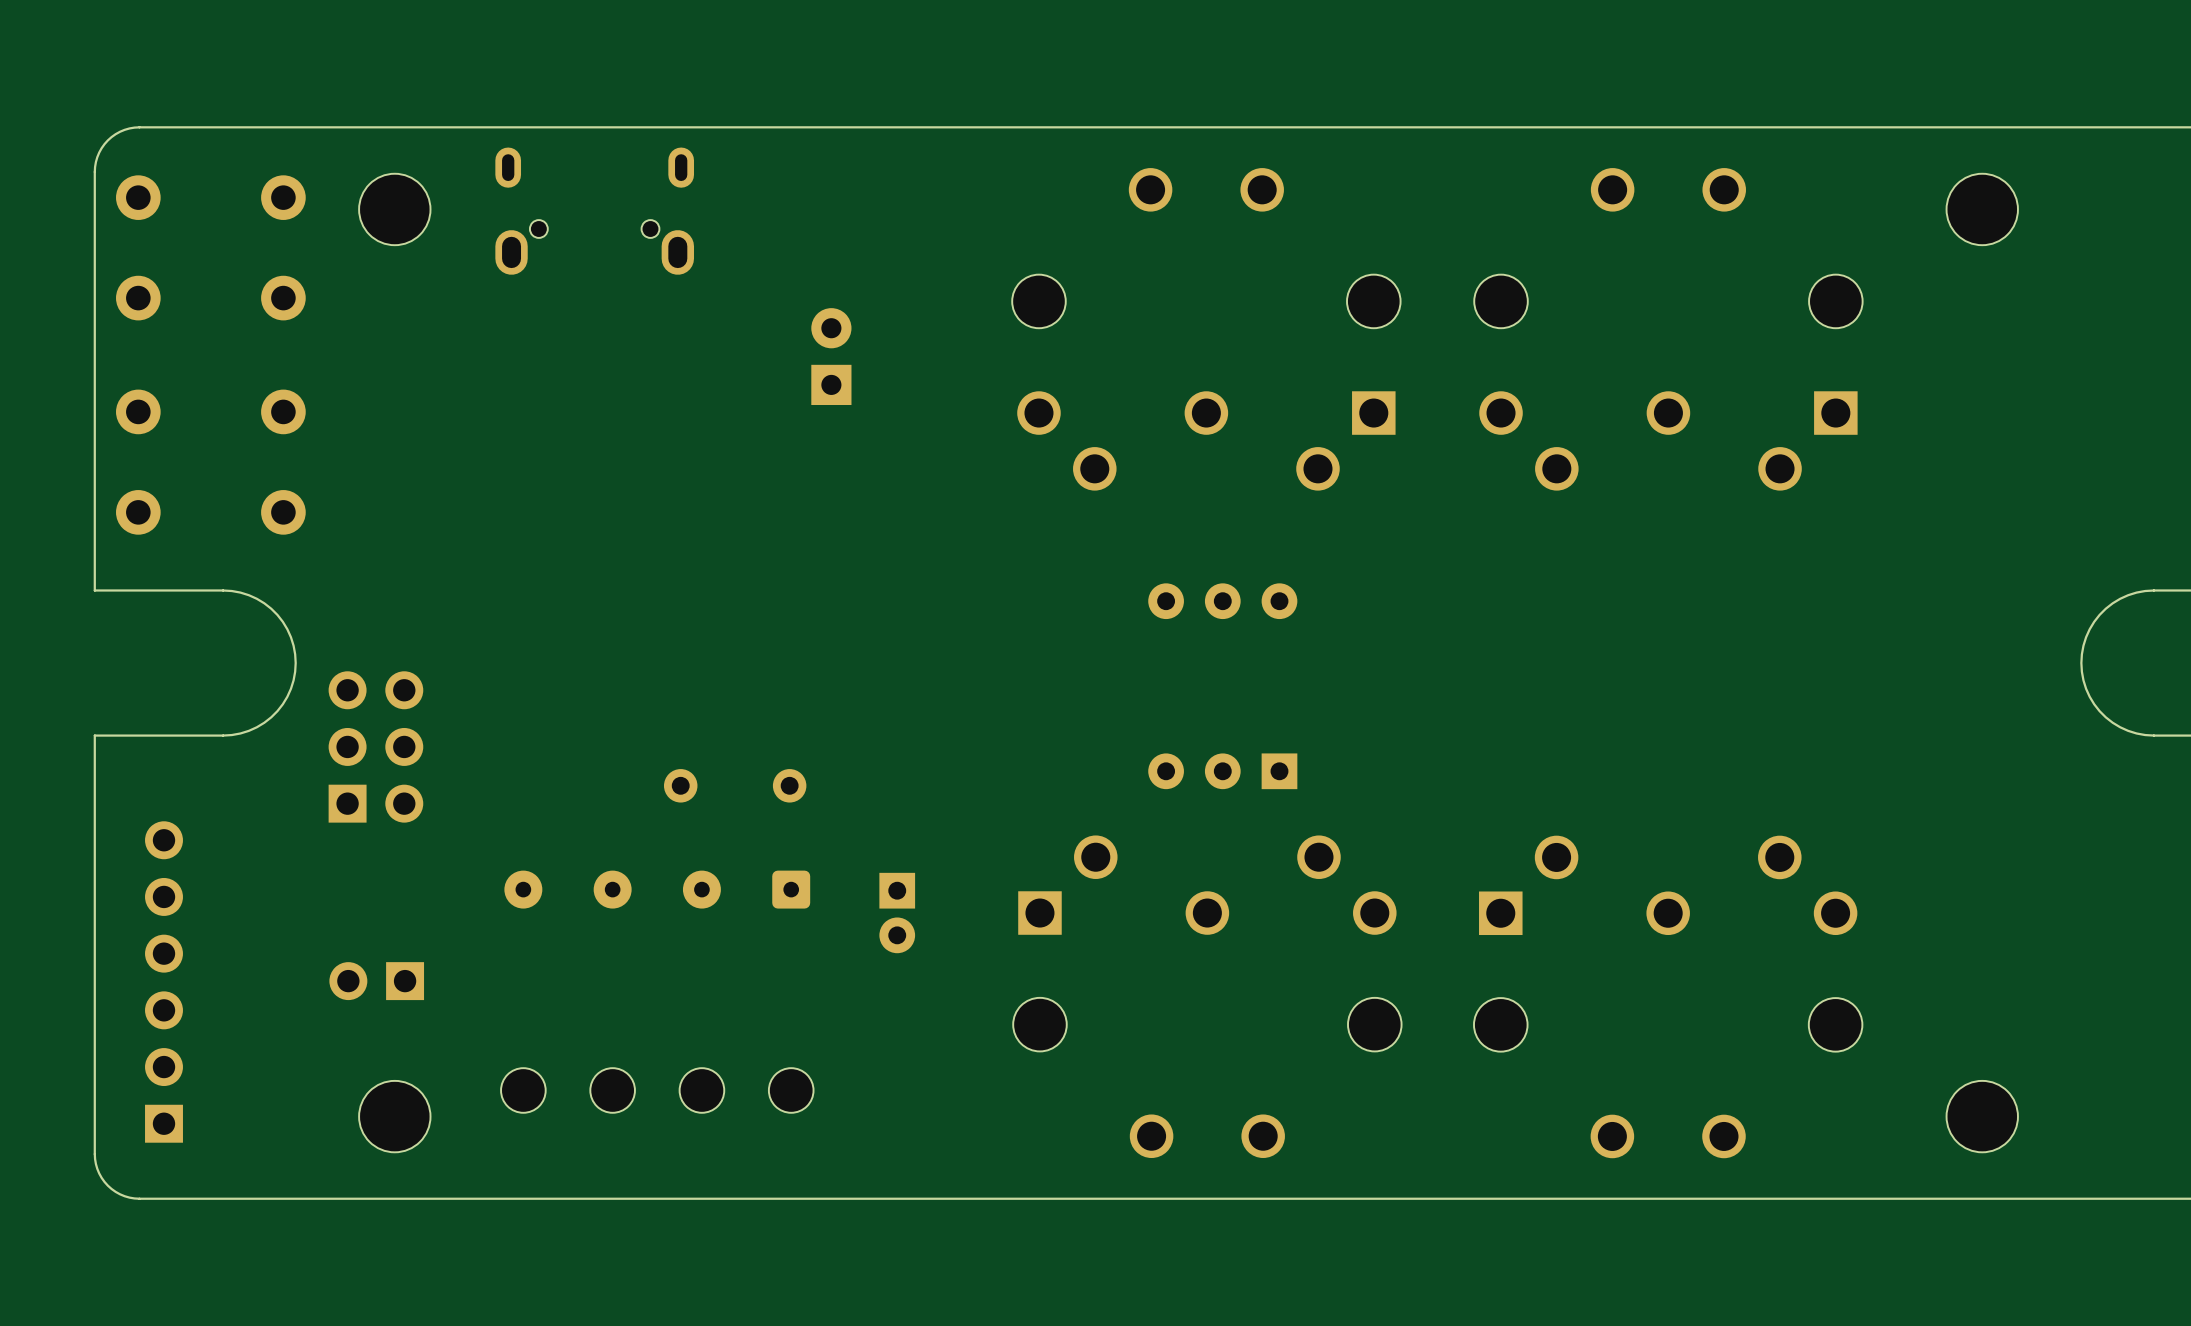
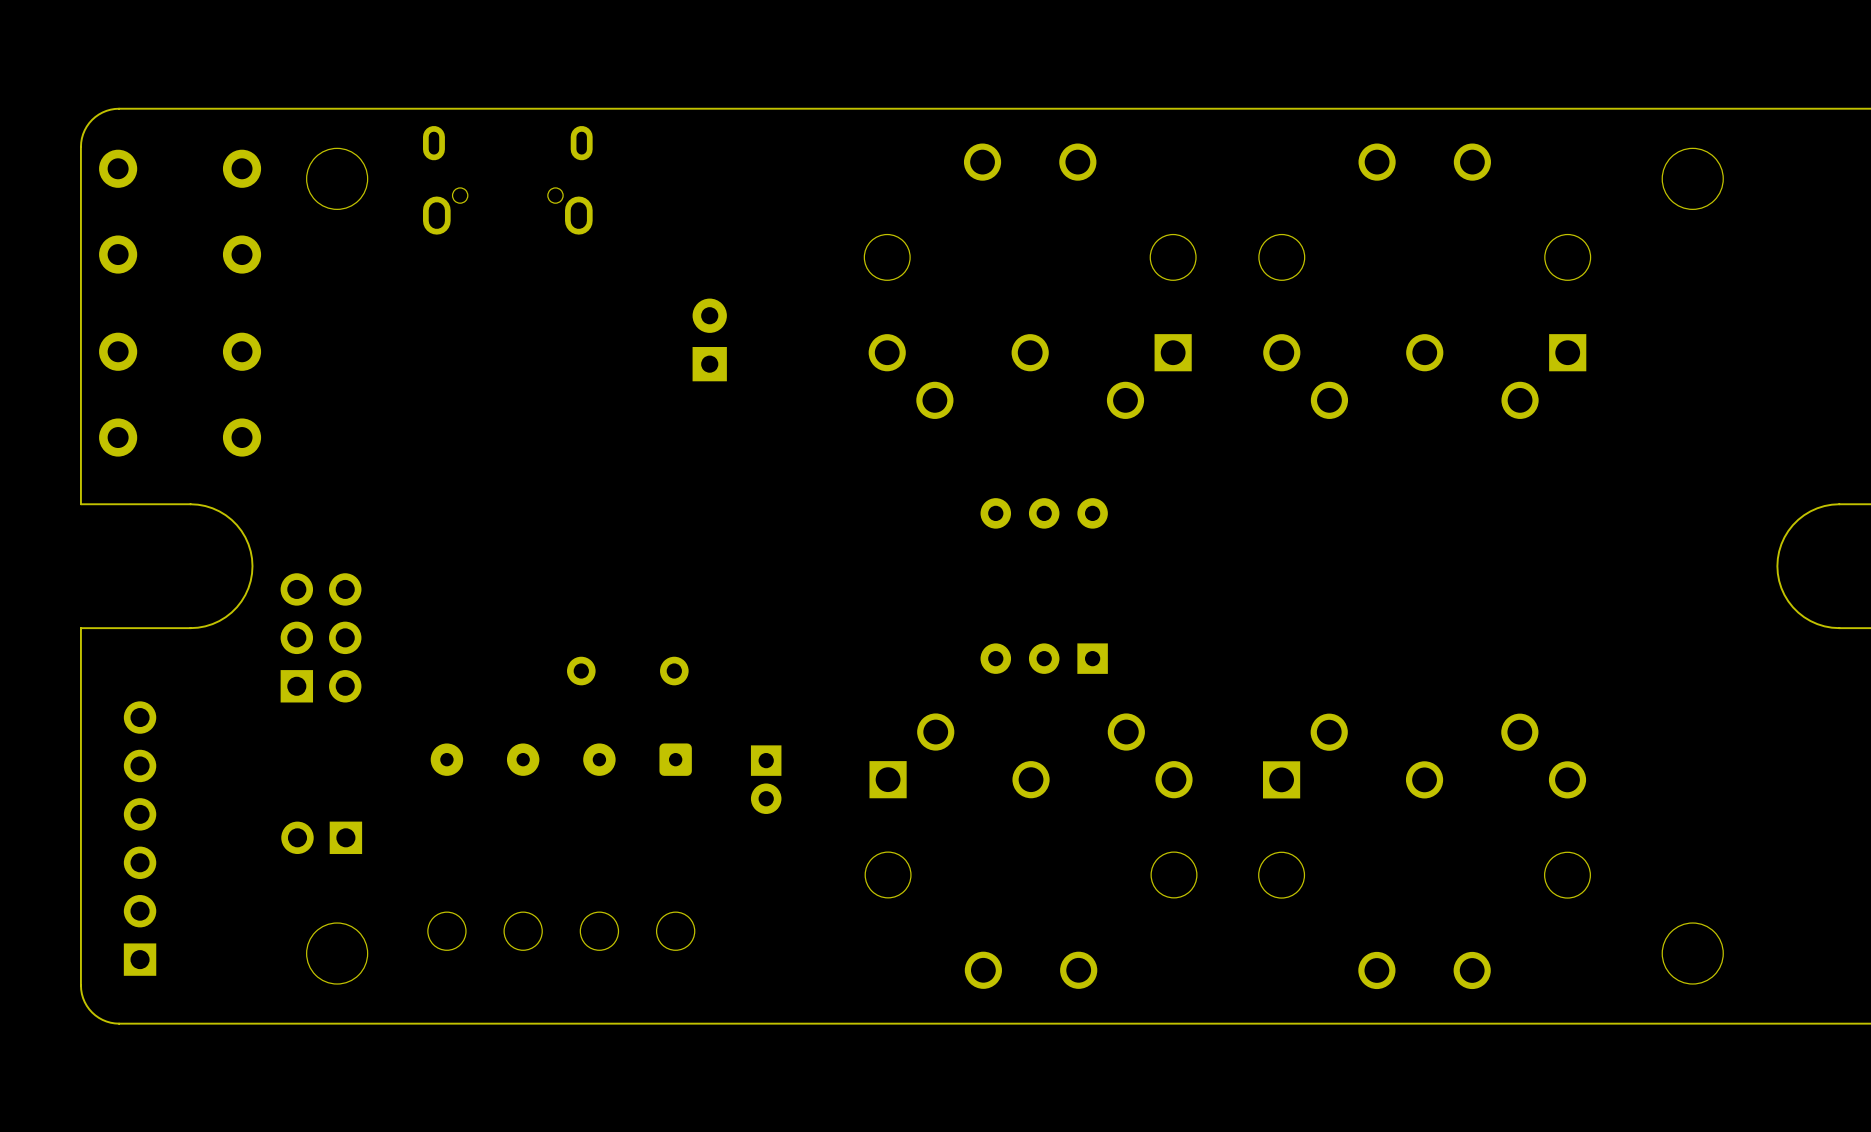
part position: (831, 356) -> (709, 339)

